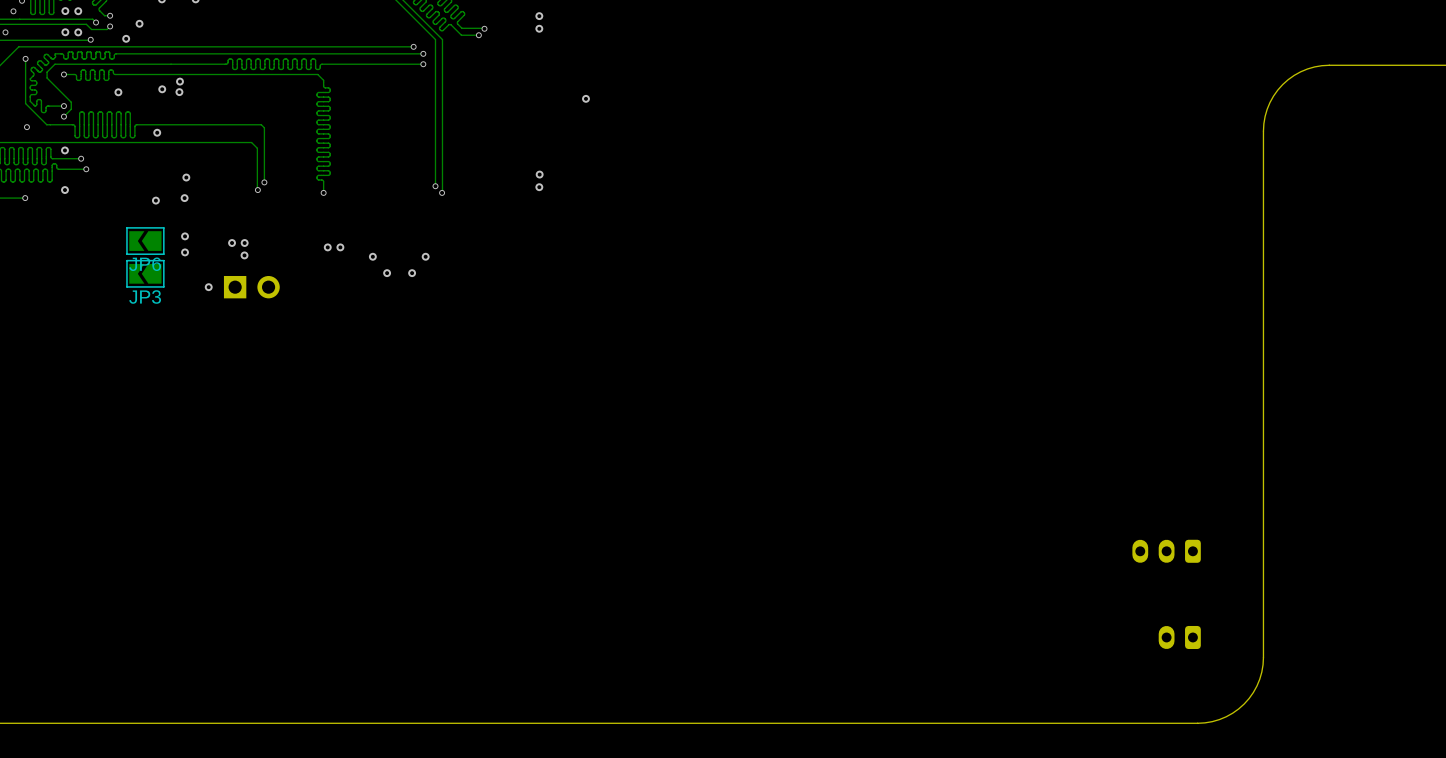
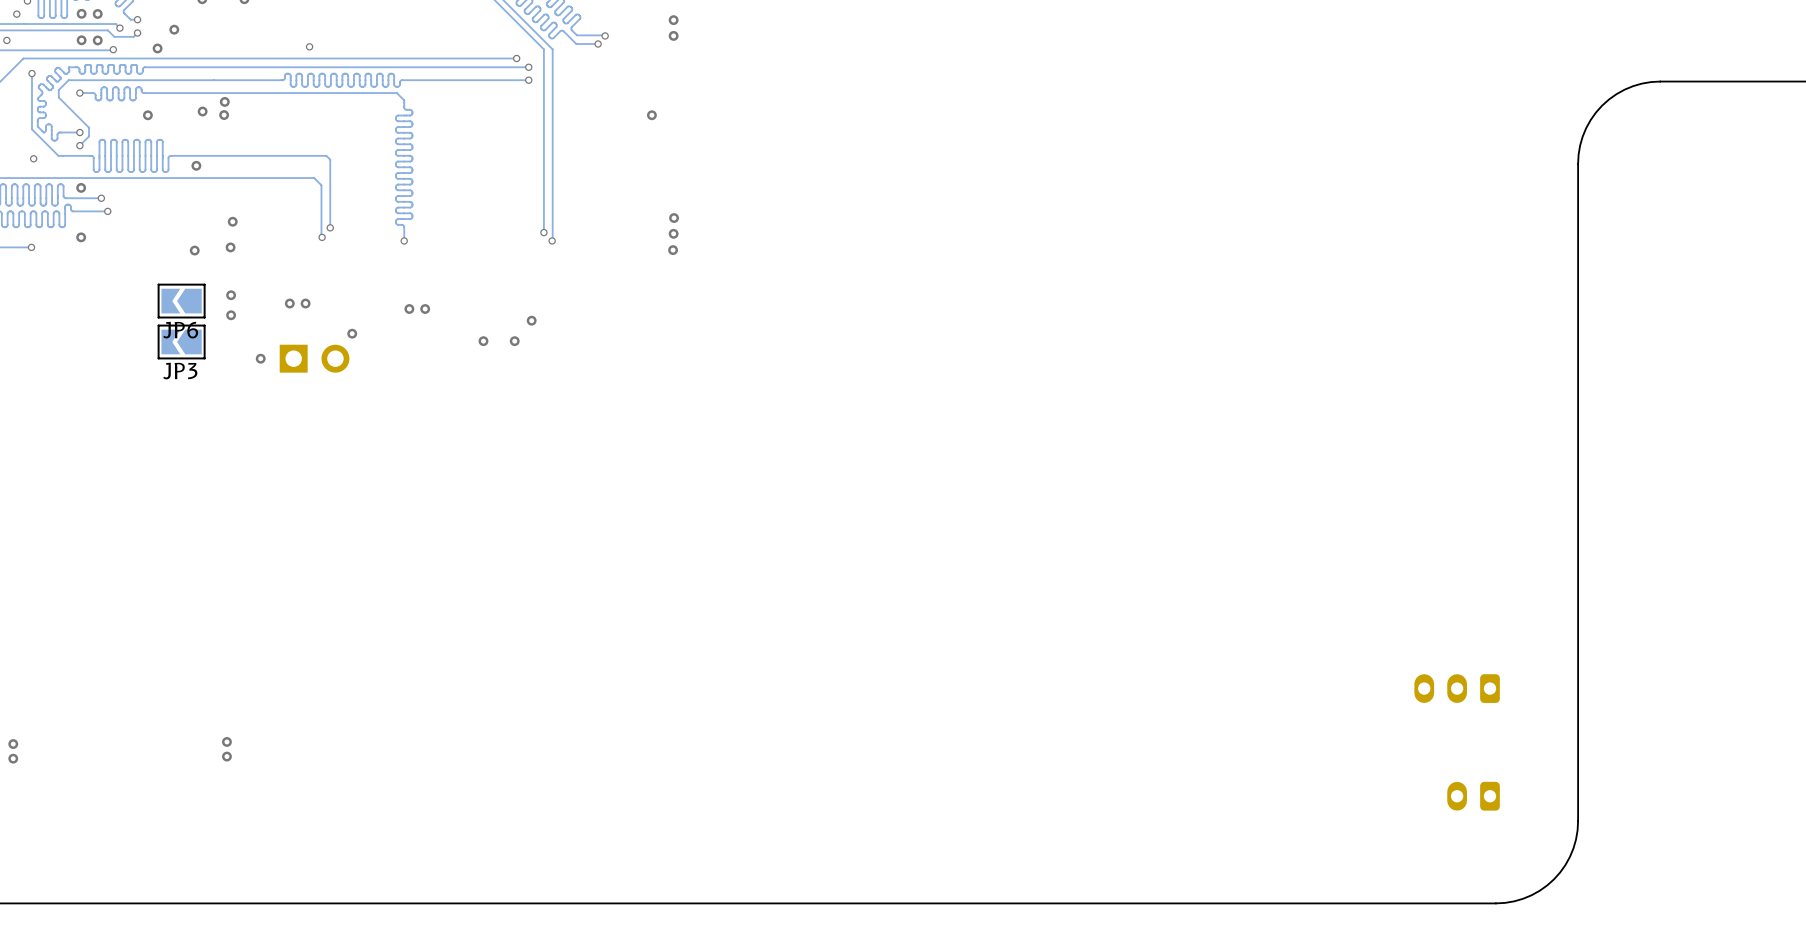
via: none -> (309, 46)
via: none -> (651, 115)
via: (585, 98) -> none
via: none -> (673, 250)
via position: (244, 255) -> (352, 333)
via: (372, 256) -> none
via: none -> (226, 741)
via: none -> (13, 744)
via: none -> (226, 756)
via: none -> (13, 758)

